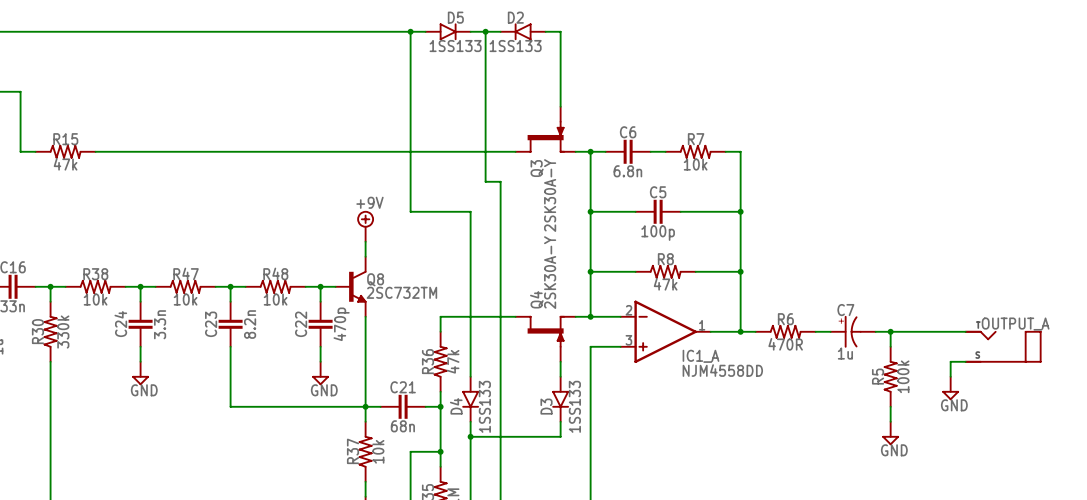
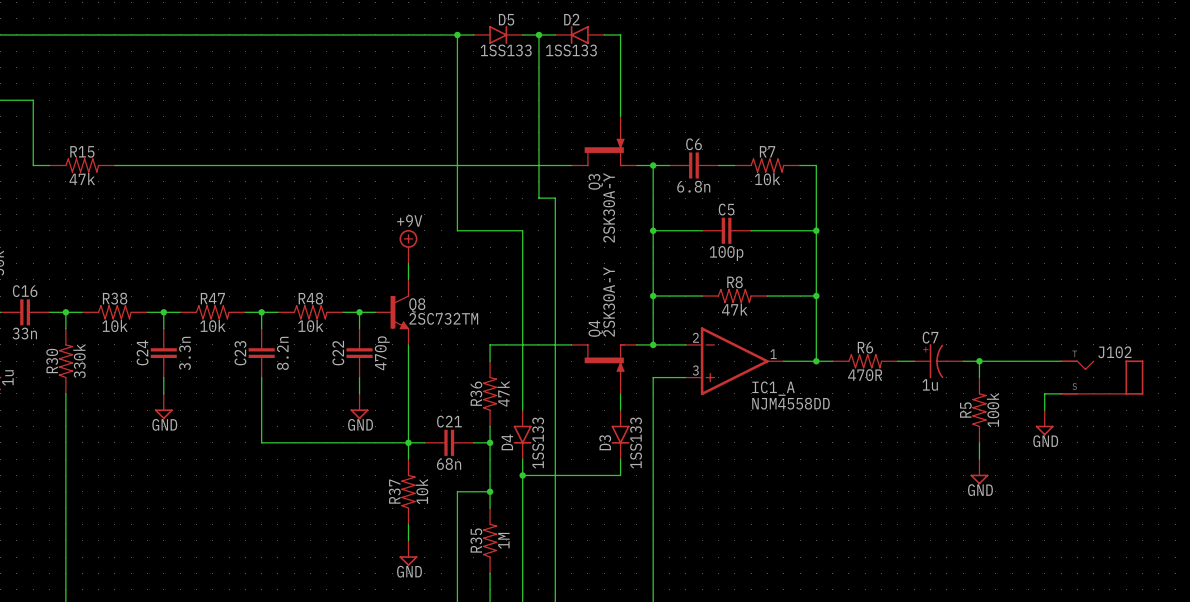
OUTPUT_A name: OUTPUT_A (1015, 324) -> J102 (1114, 352)

